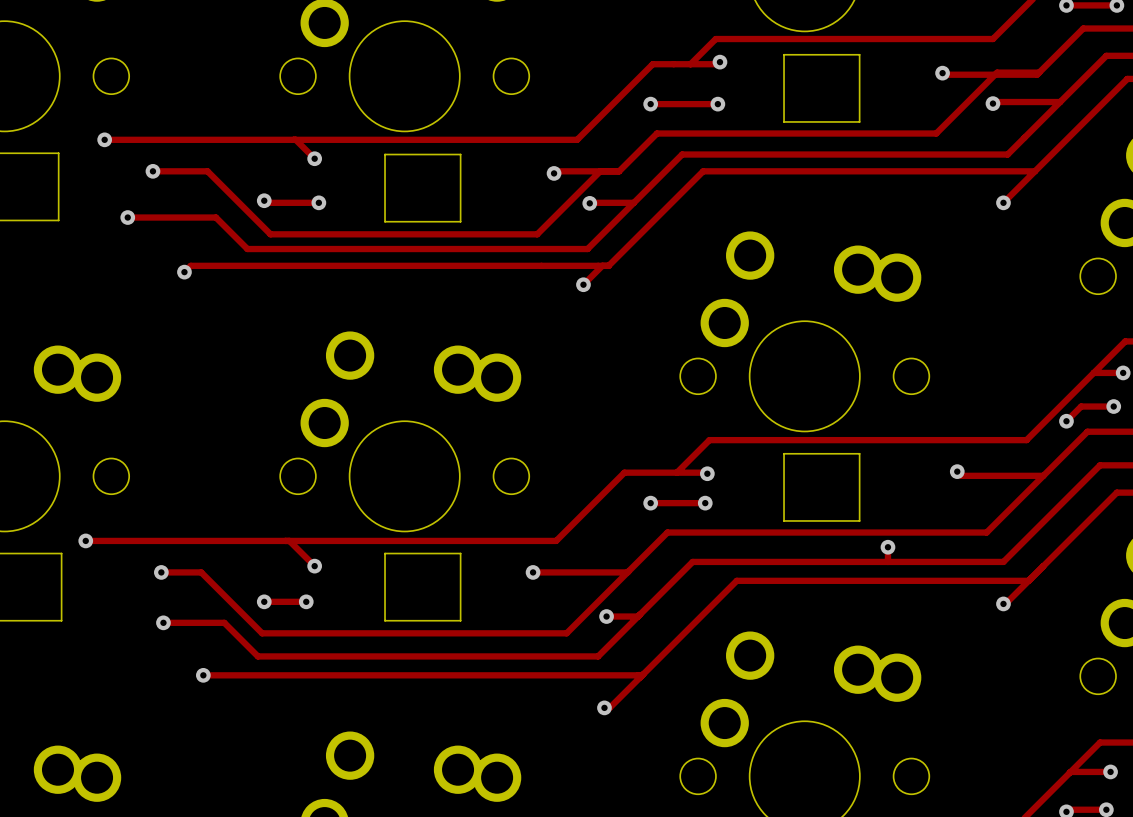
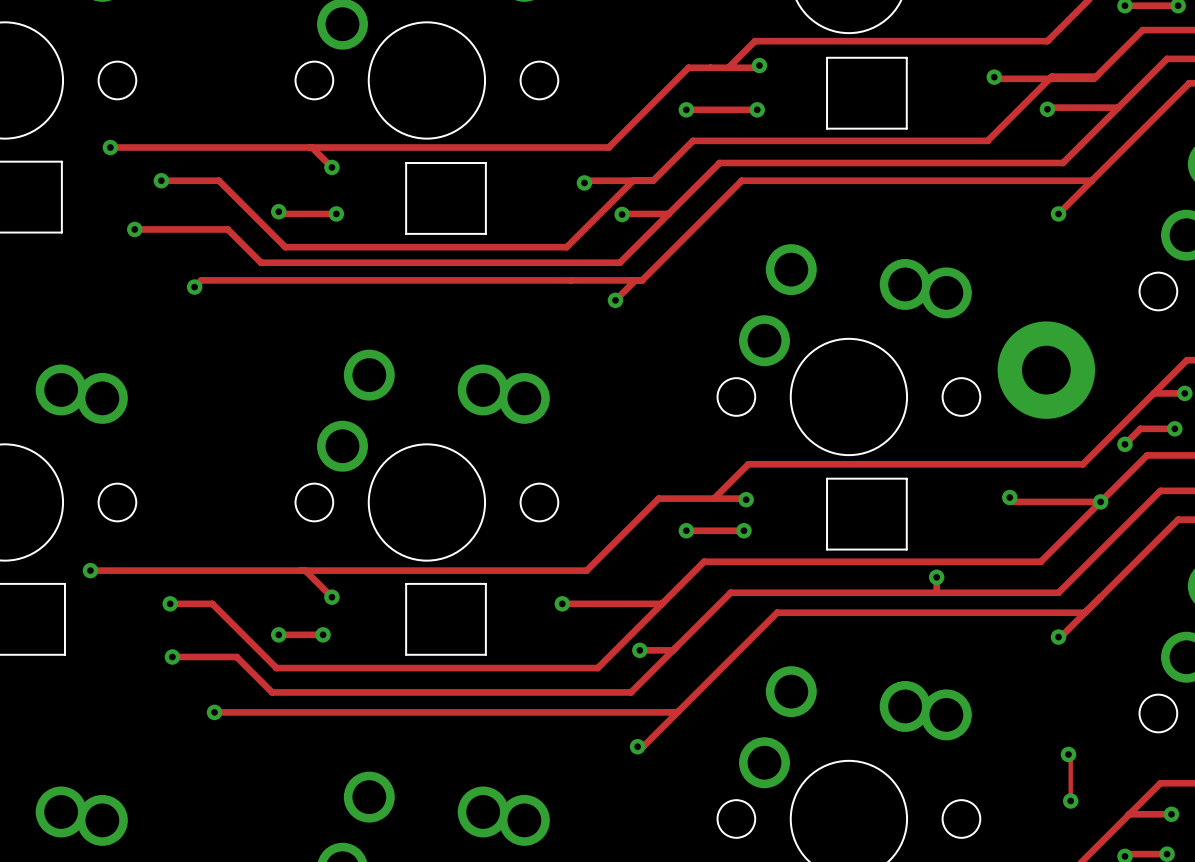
part: none -> (1046, 370)
via: none -> (1100, 501)
track: none -> (1068, 754) (1070, 756) (1070, 800)
via: none -> (1068, 754)
via: none -> (1070, 800)

